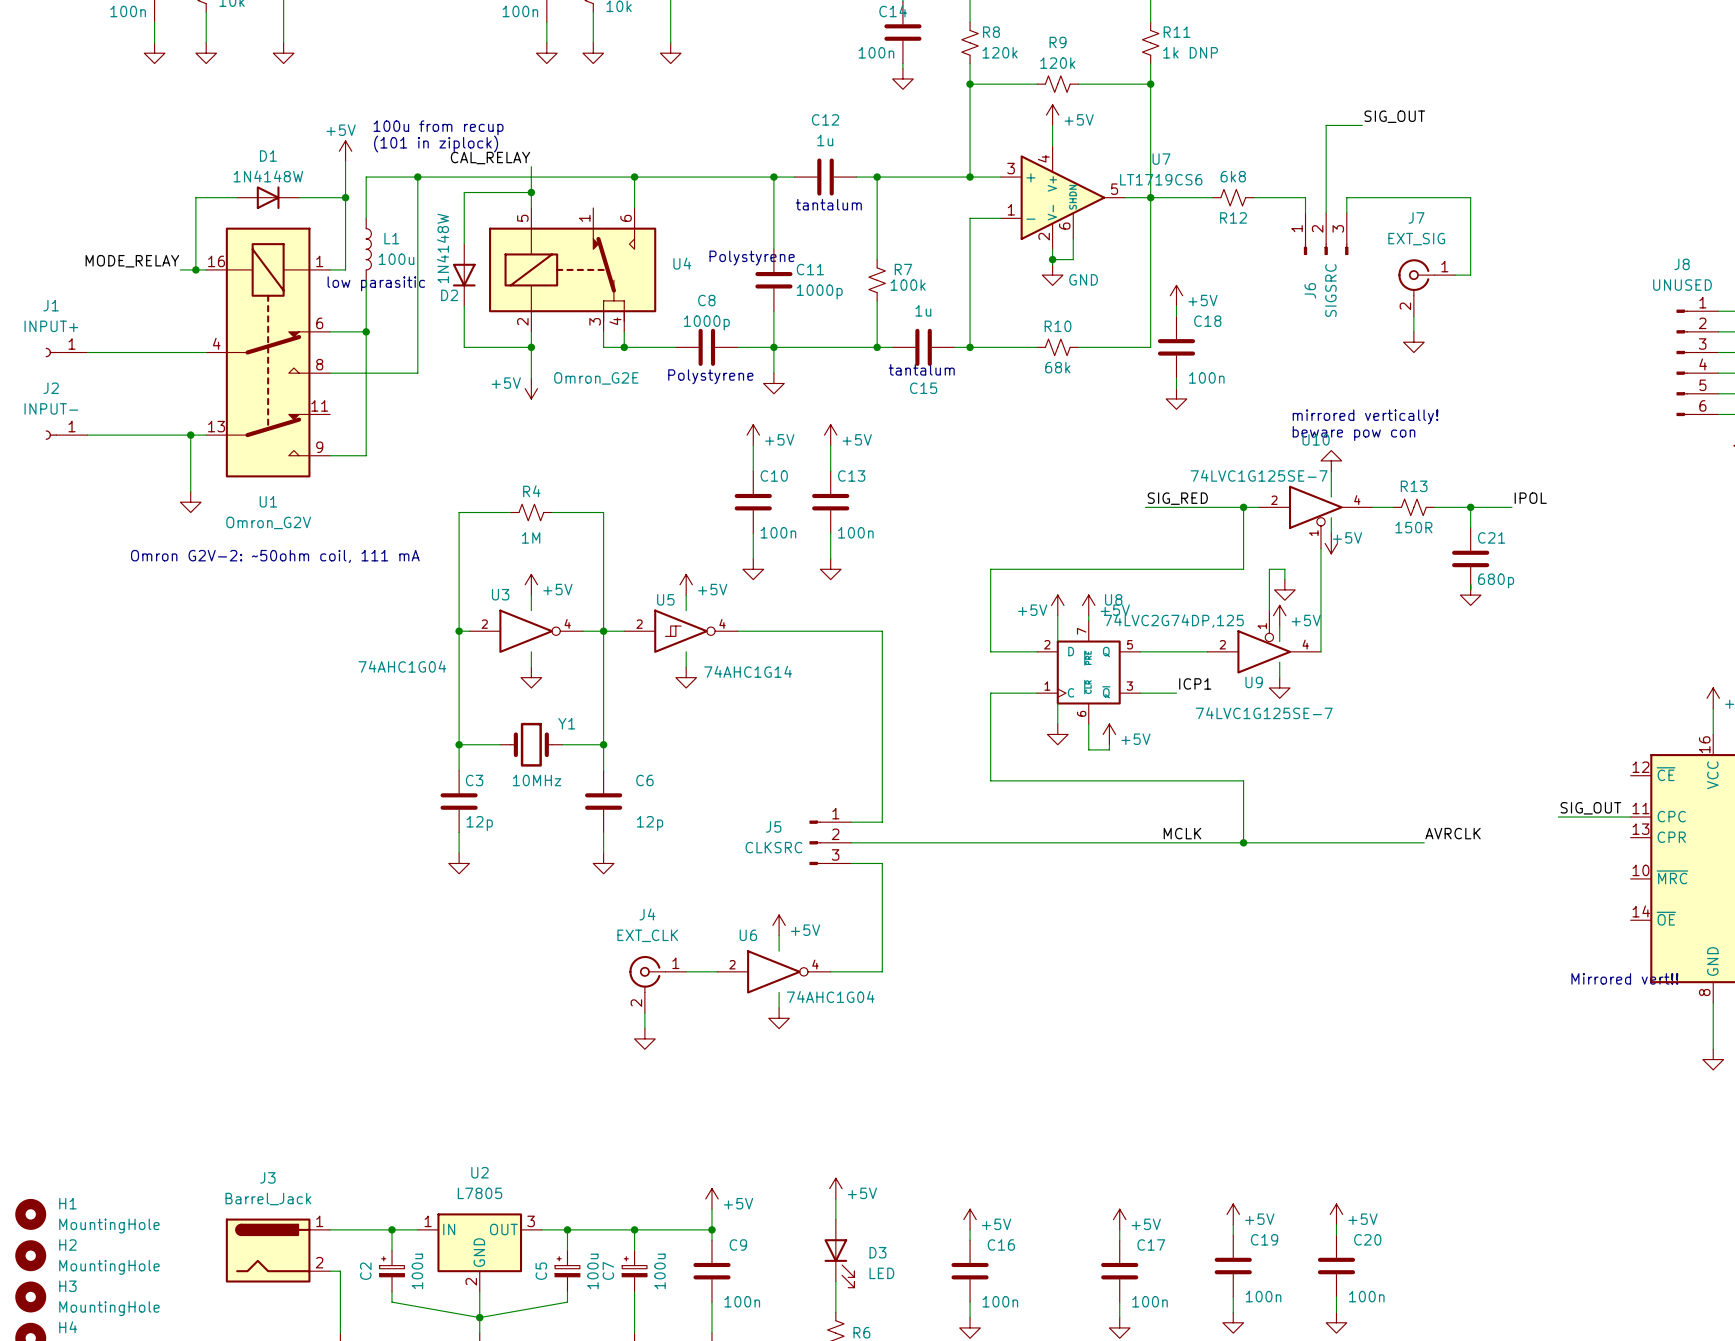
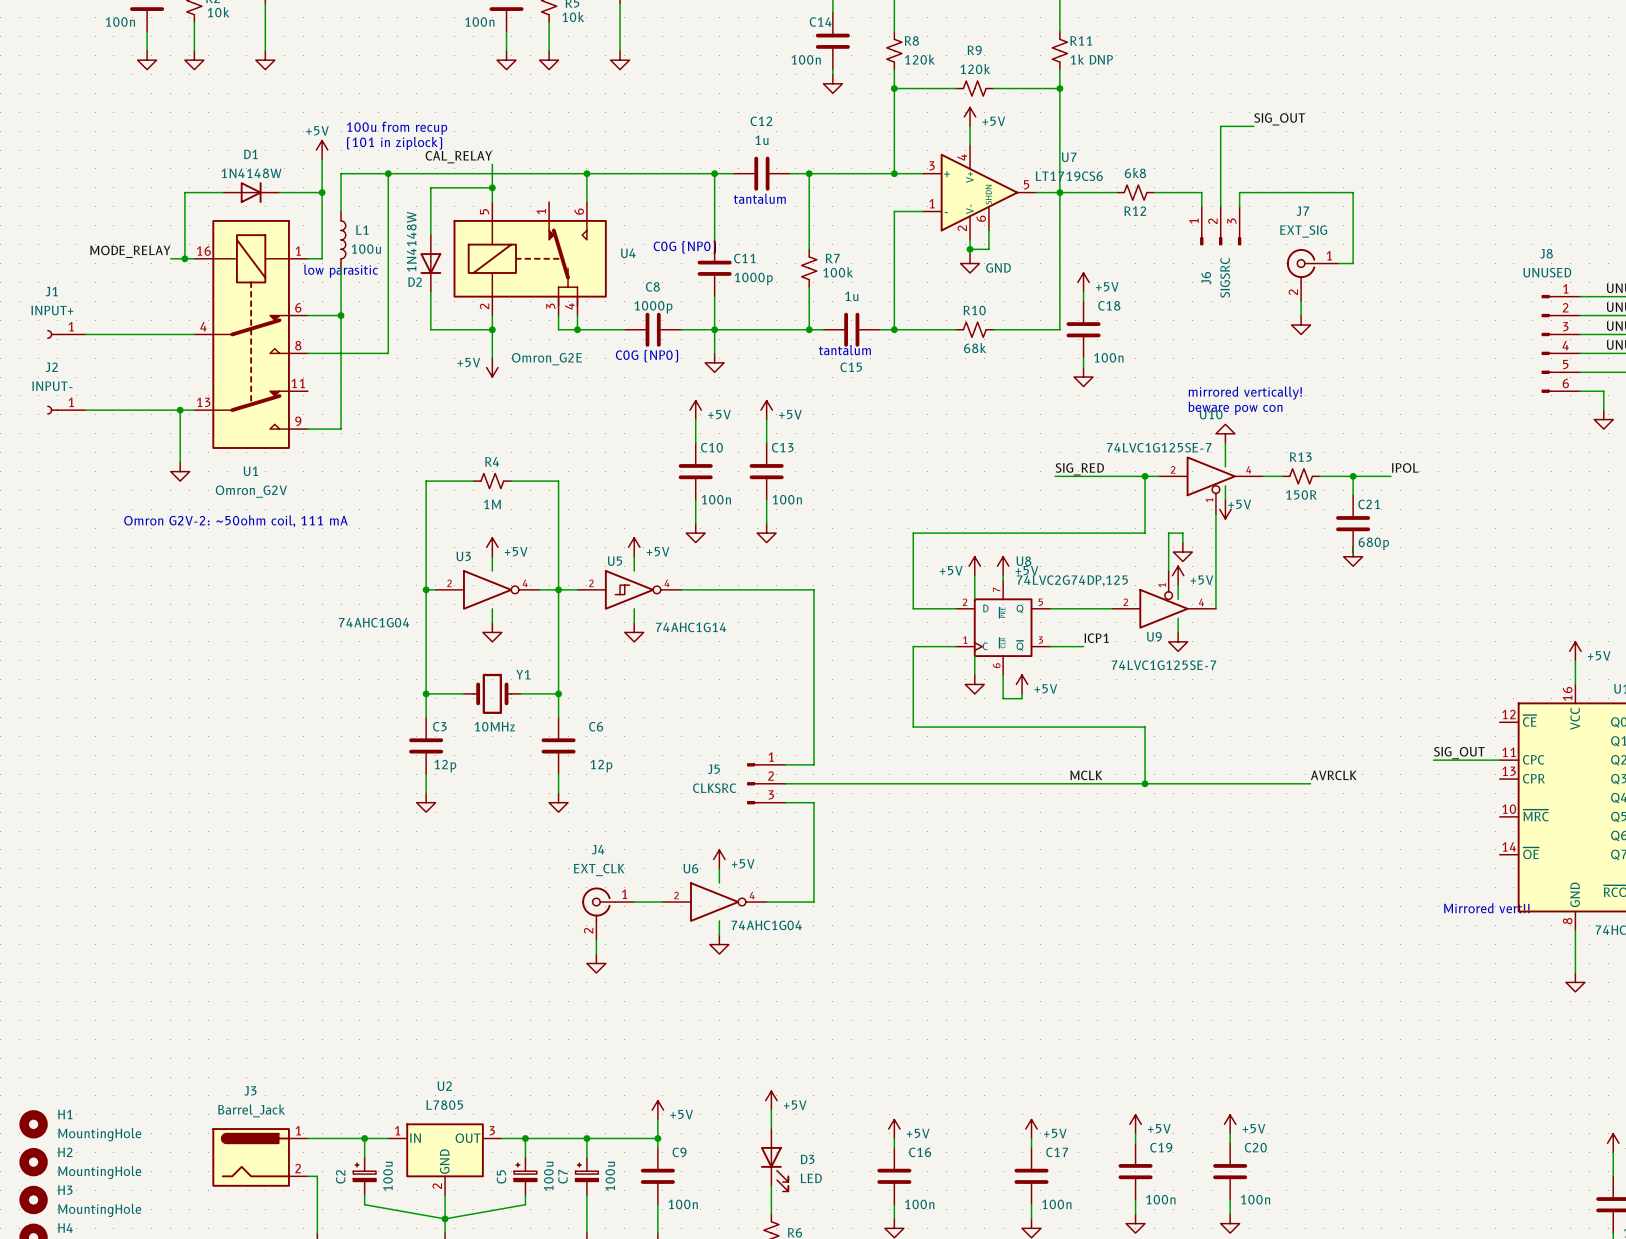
text: Polystyrene (752, 258) -> C0G (NP0) (684, 247)
text: Polystyrene (710, 376) -> C0G (NP0) (647, 356)

